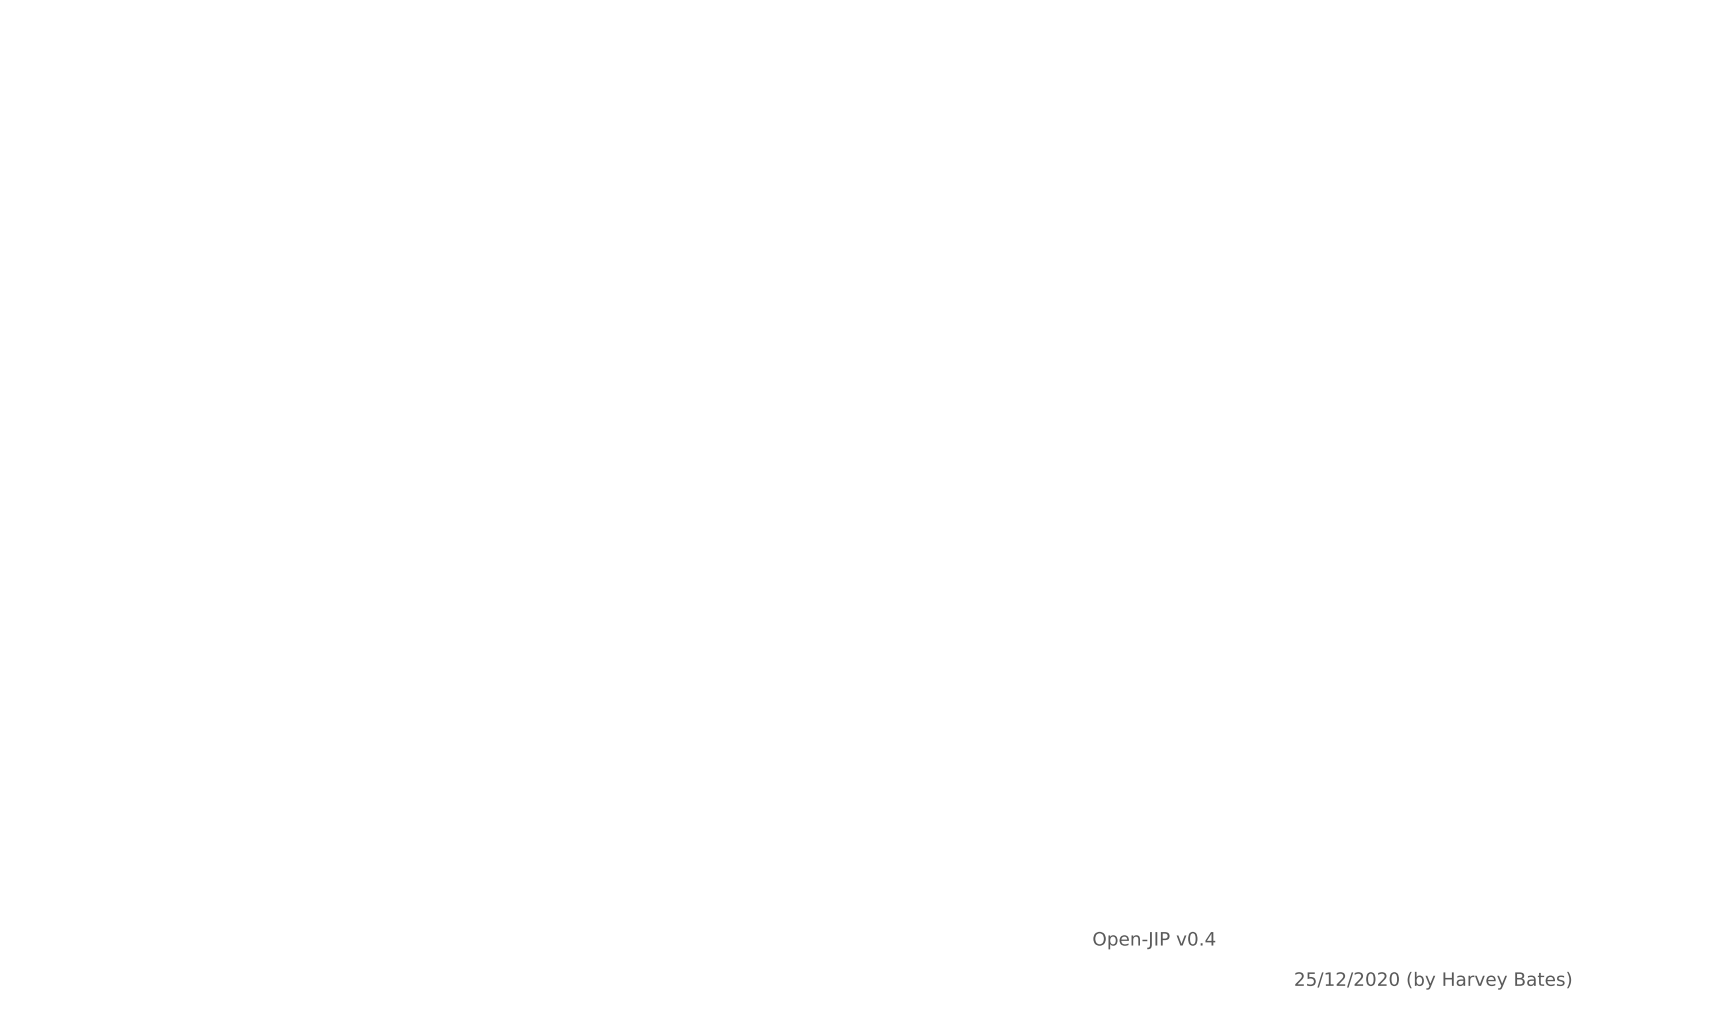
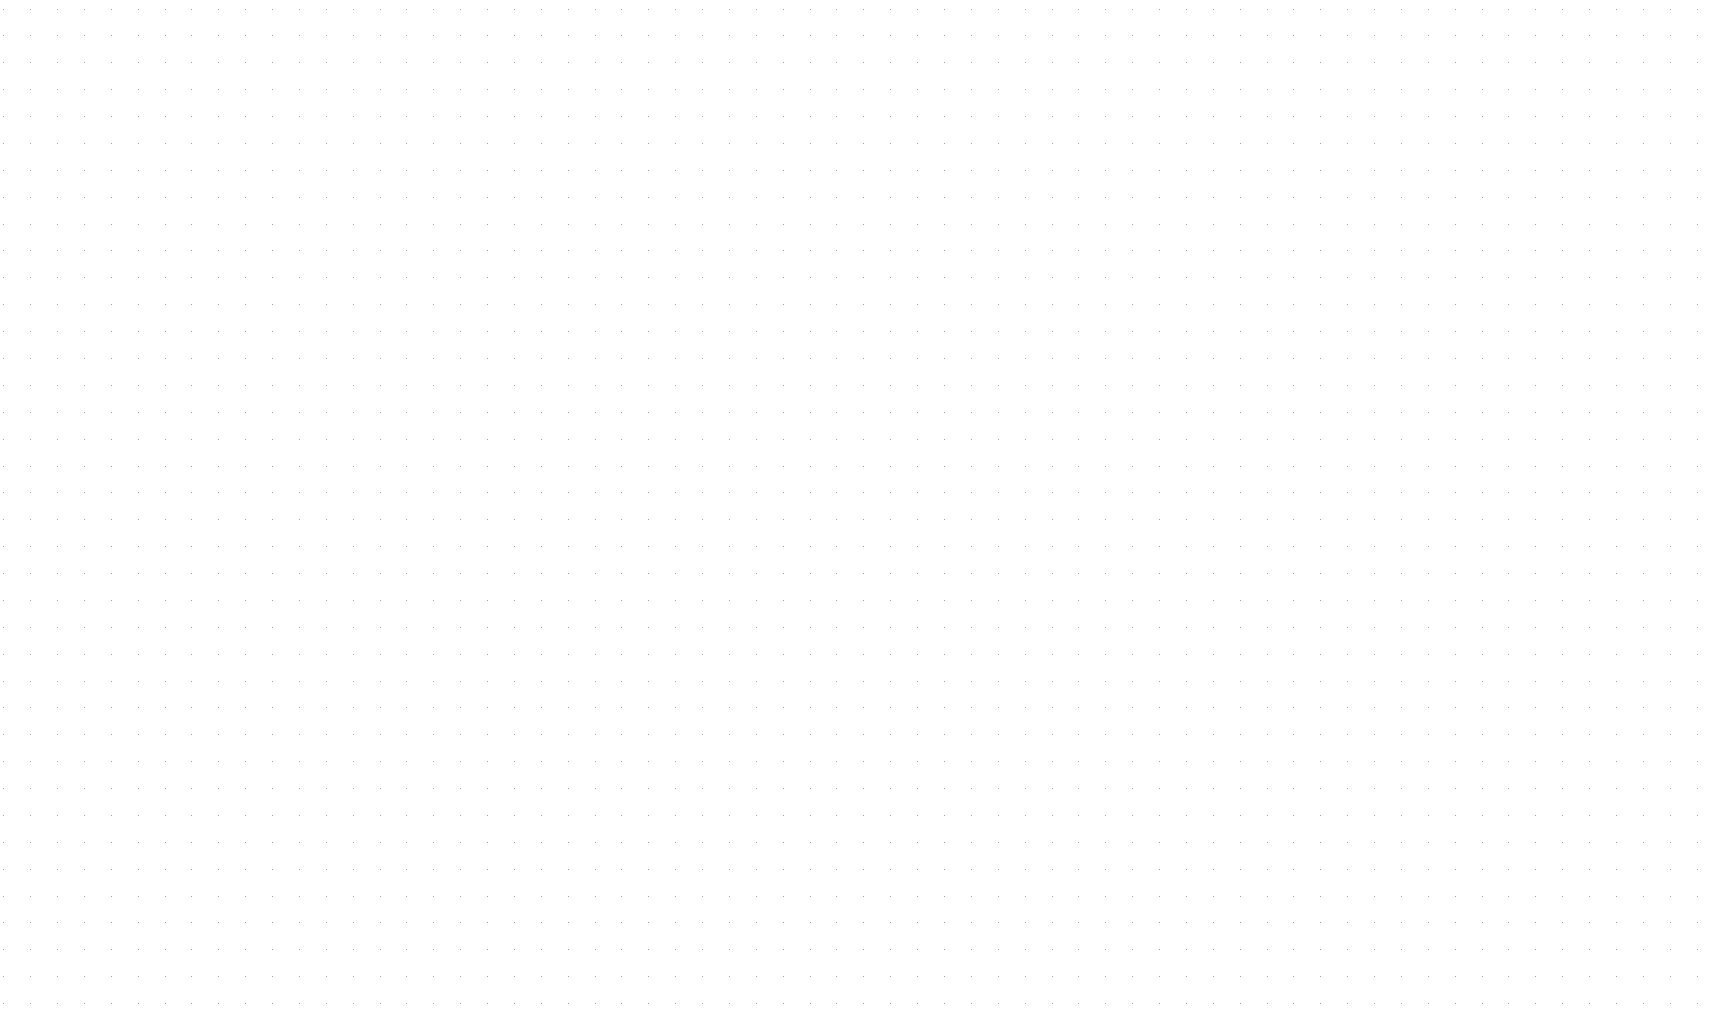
text: Open-JIP v0.4 (1154, 940) -> none
text: 25/12/2020 (by Harvey Bates) (1433, 980) -> none

